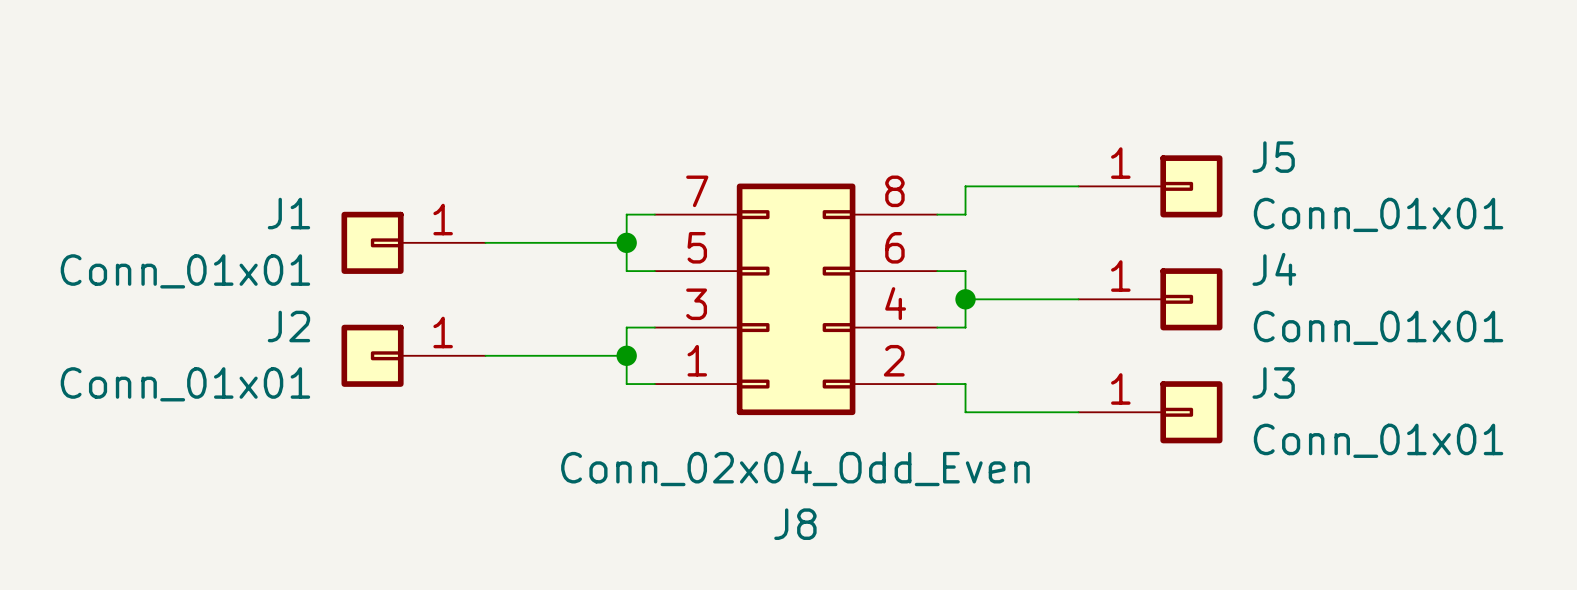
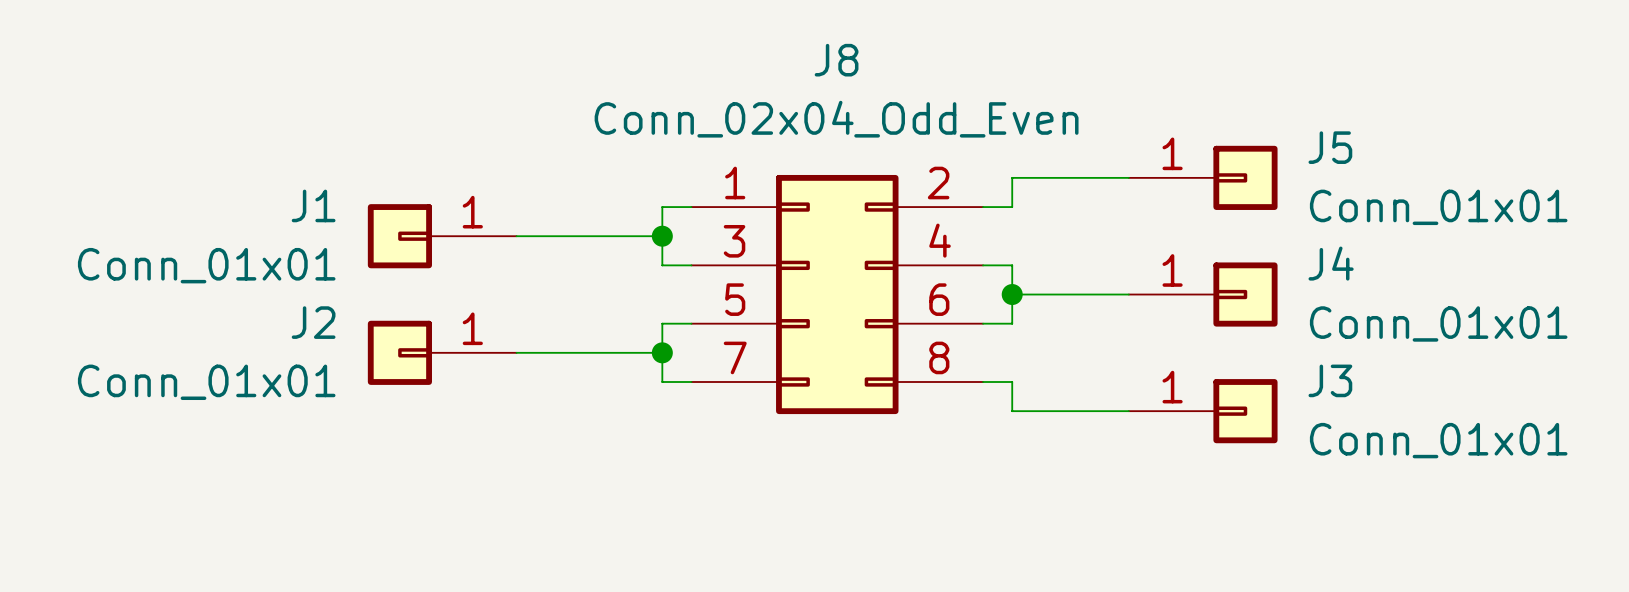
J8 flip: as is (796, 299) -> up-down (837, 294)

